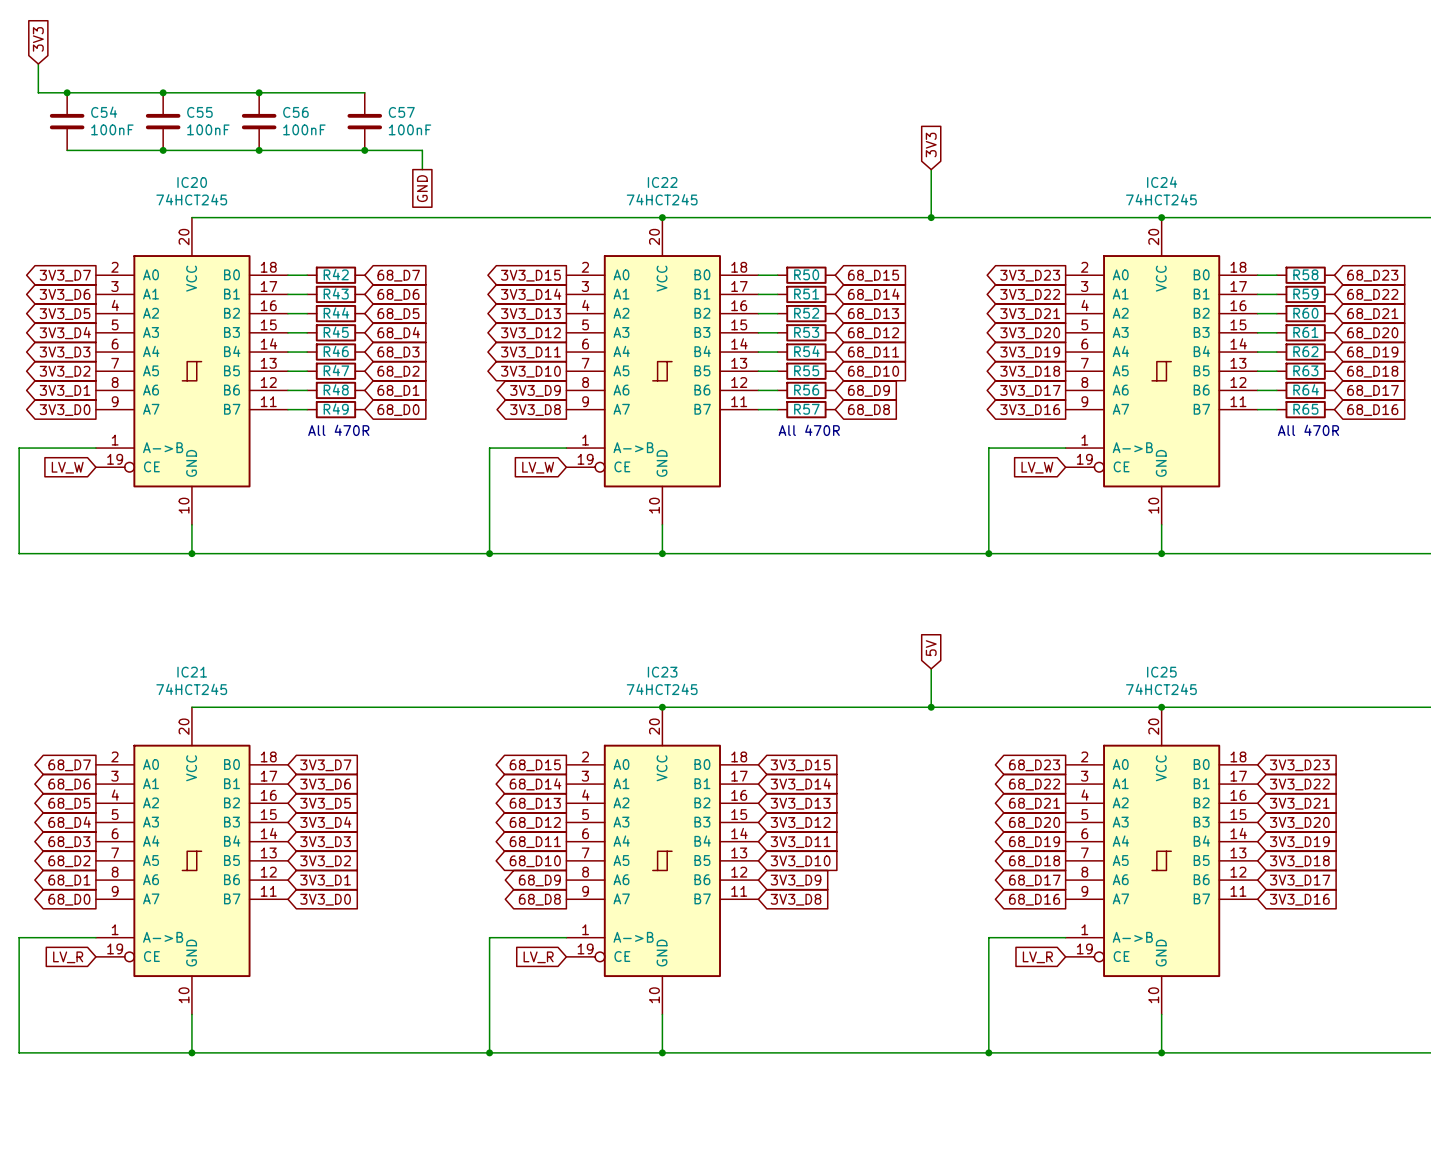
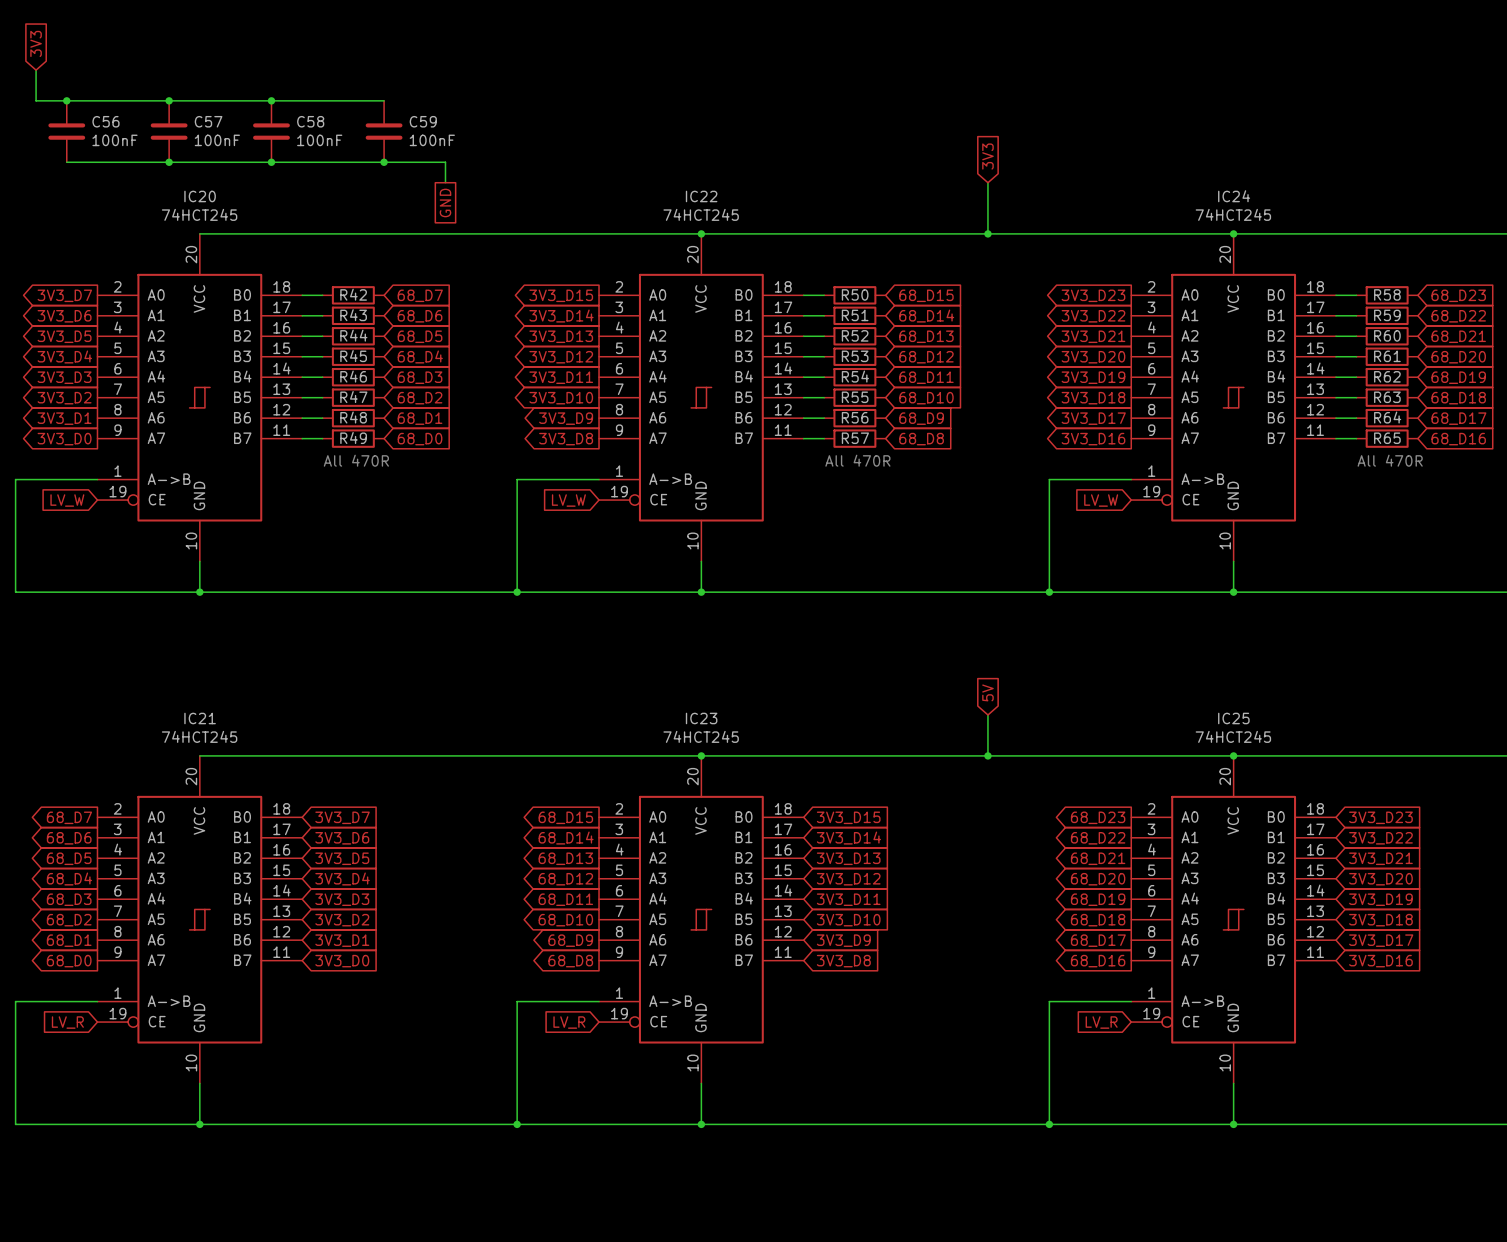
C54 name: C54 (104, 112) -> C56 (105, 121)
C55 name: C55 (199, 112) -> C57 (208, 121)
C56 name: C56 (295, 112) -> C58 (310, 121)
C57 name: C57 (401, 112) -> C59 (423, 121)

